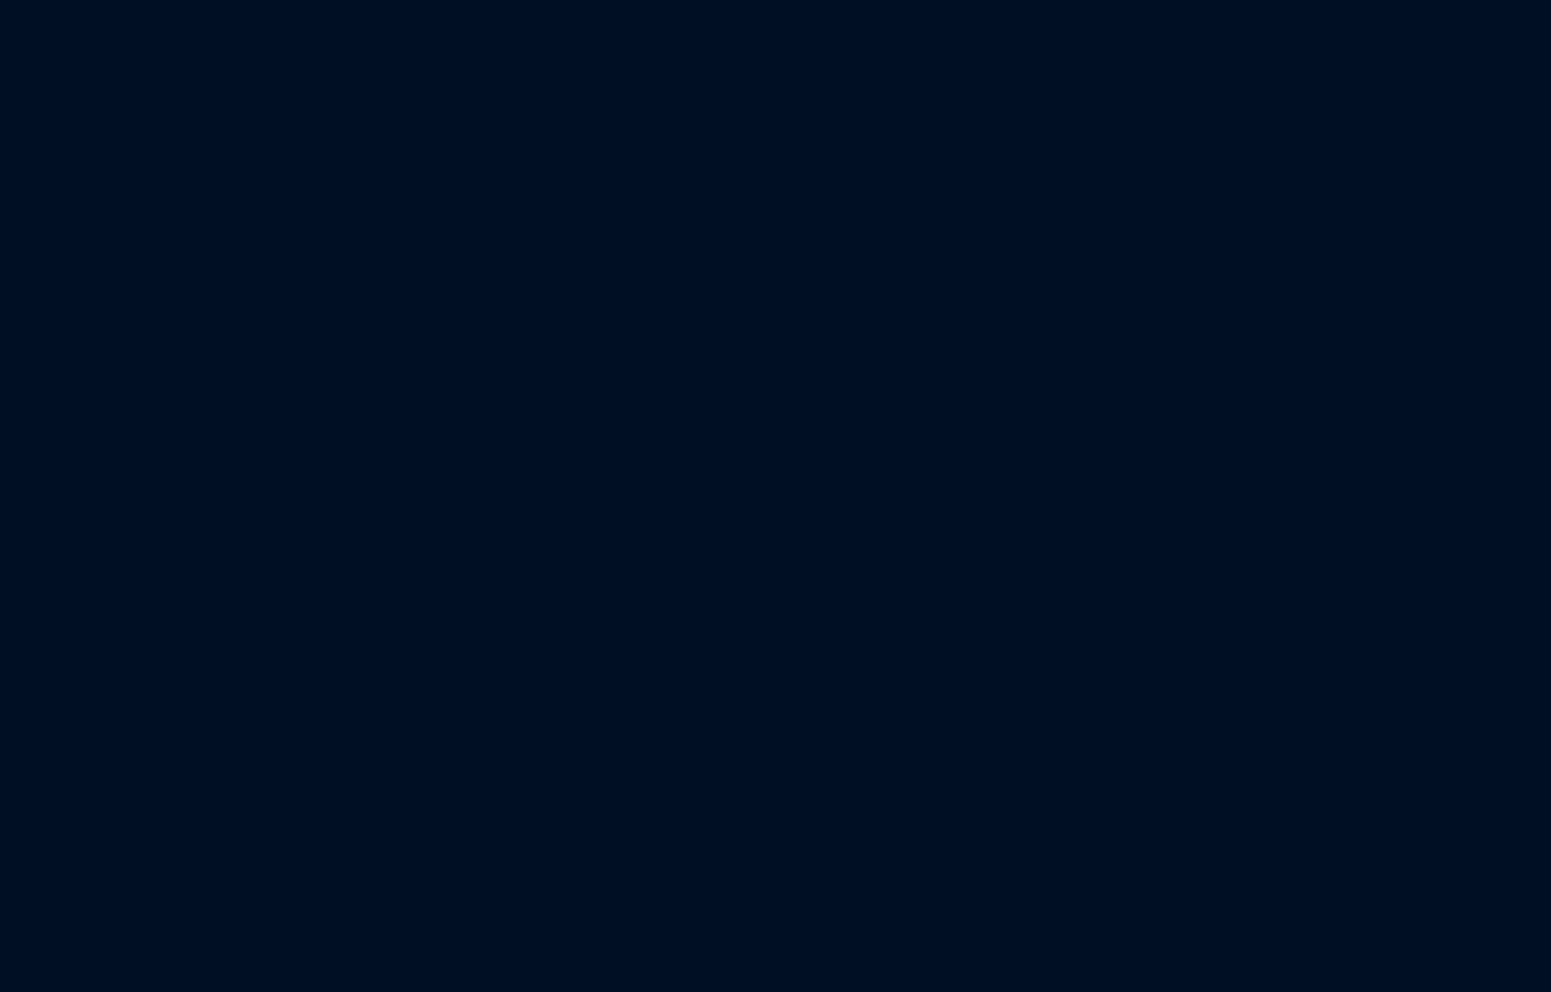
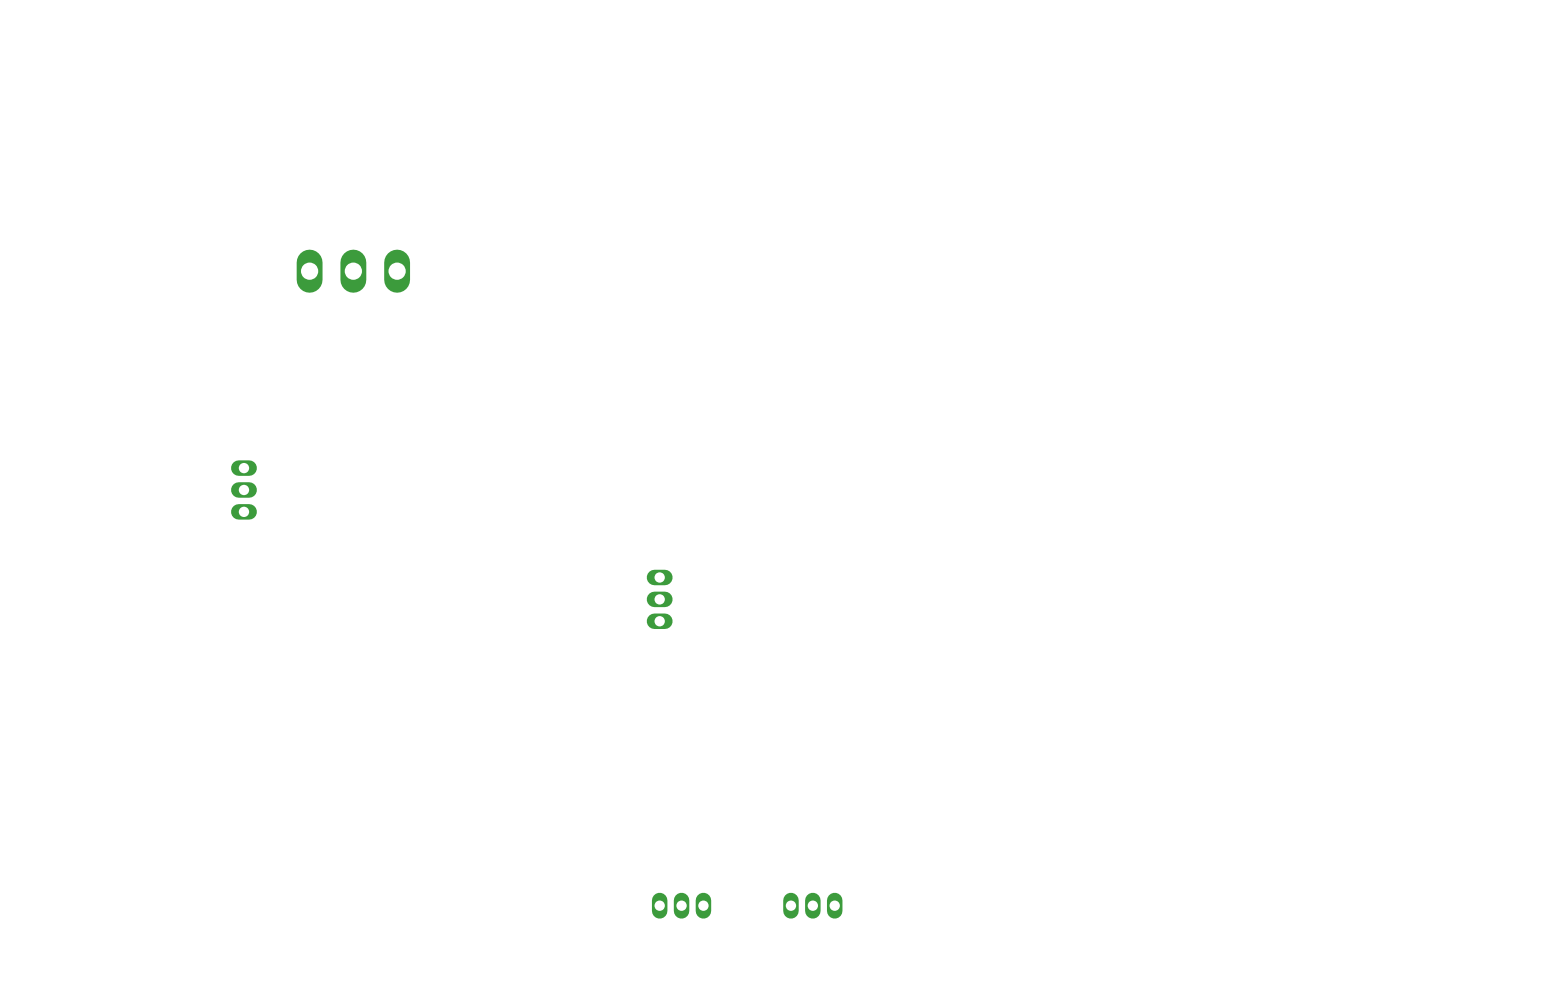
part: none -> (353, 271)
part: none -> (243, 489)
part: none -> (659, 599)
part: none -> (681, 905)
part: none -> (812, 905)

